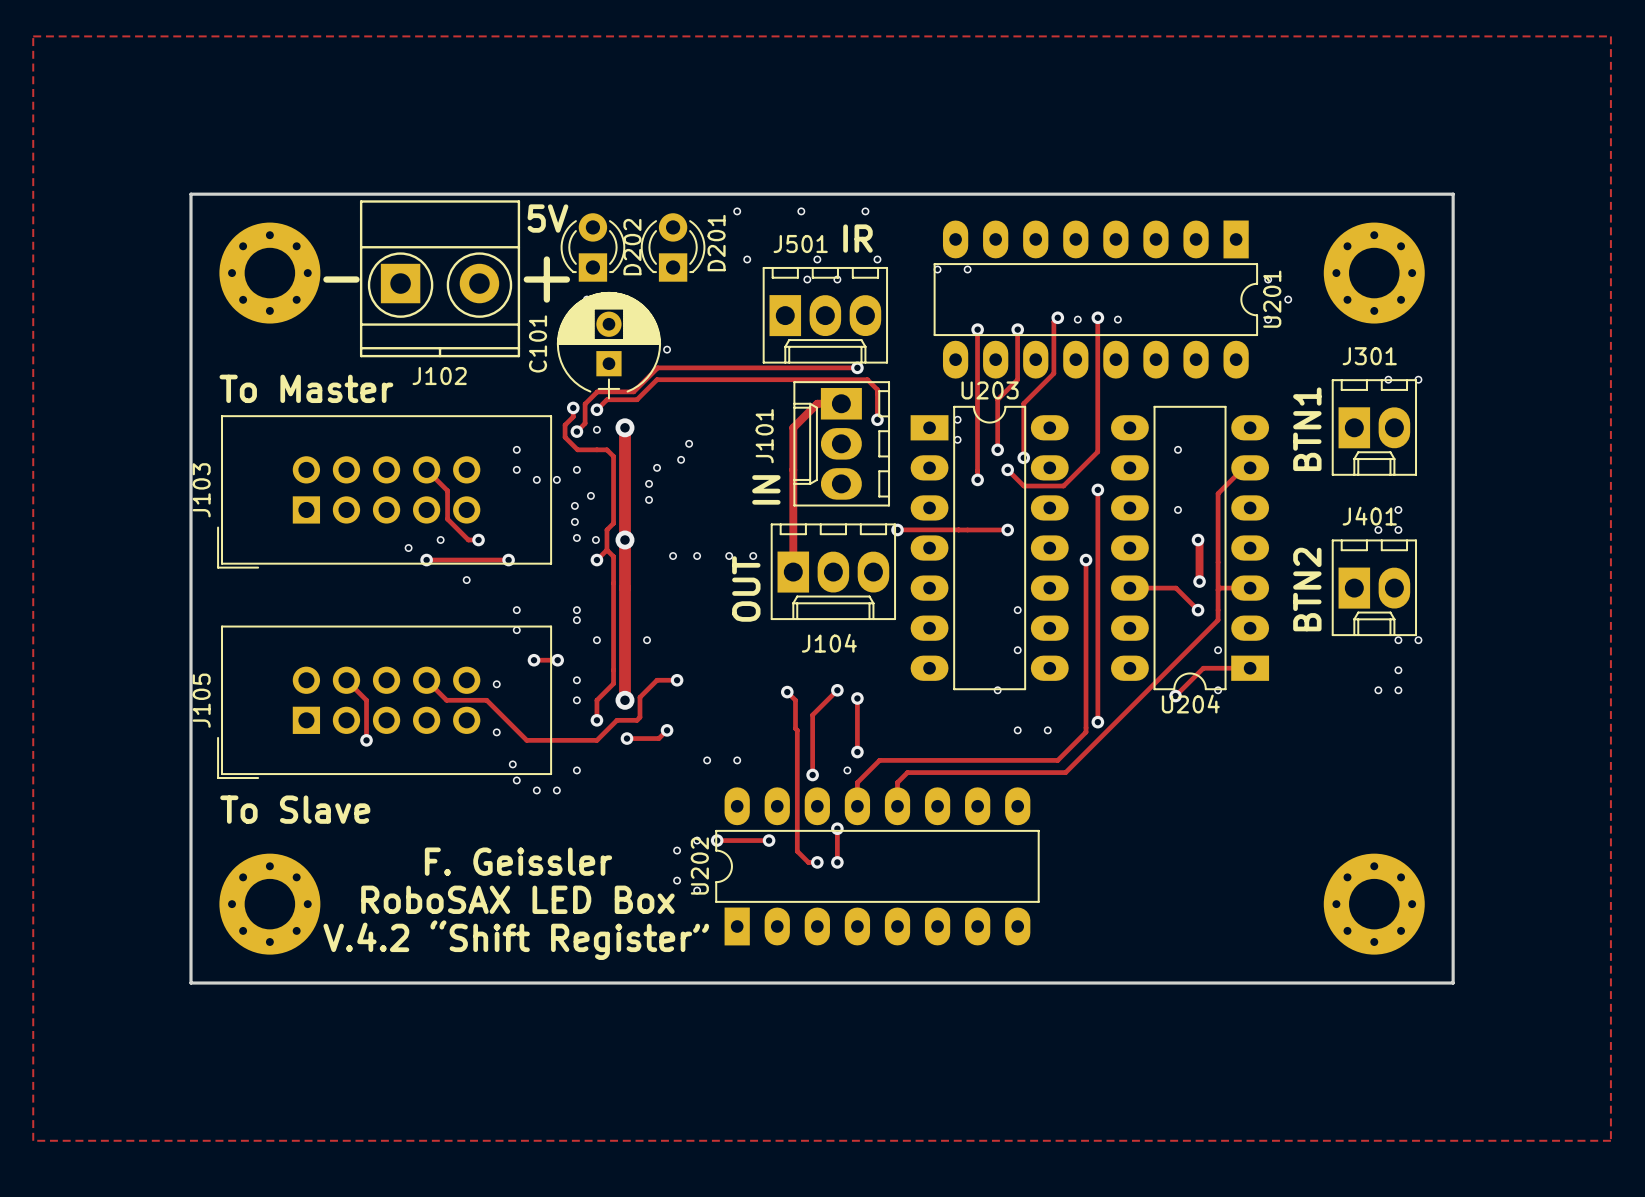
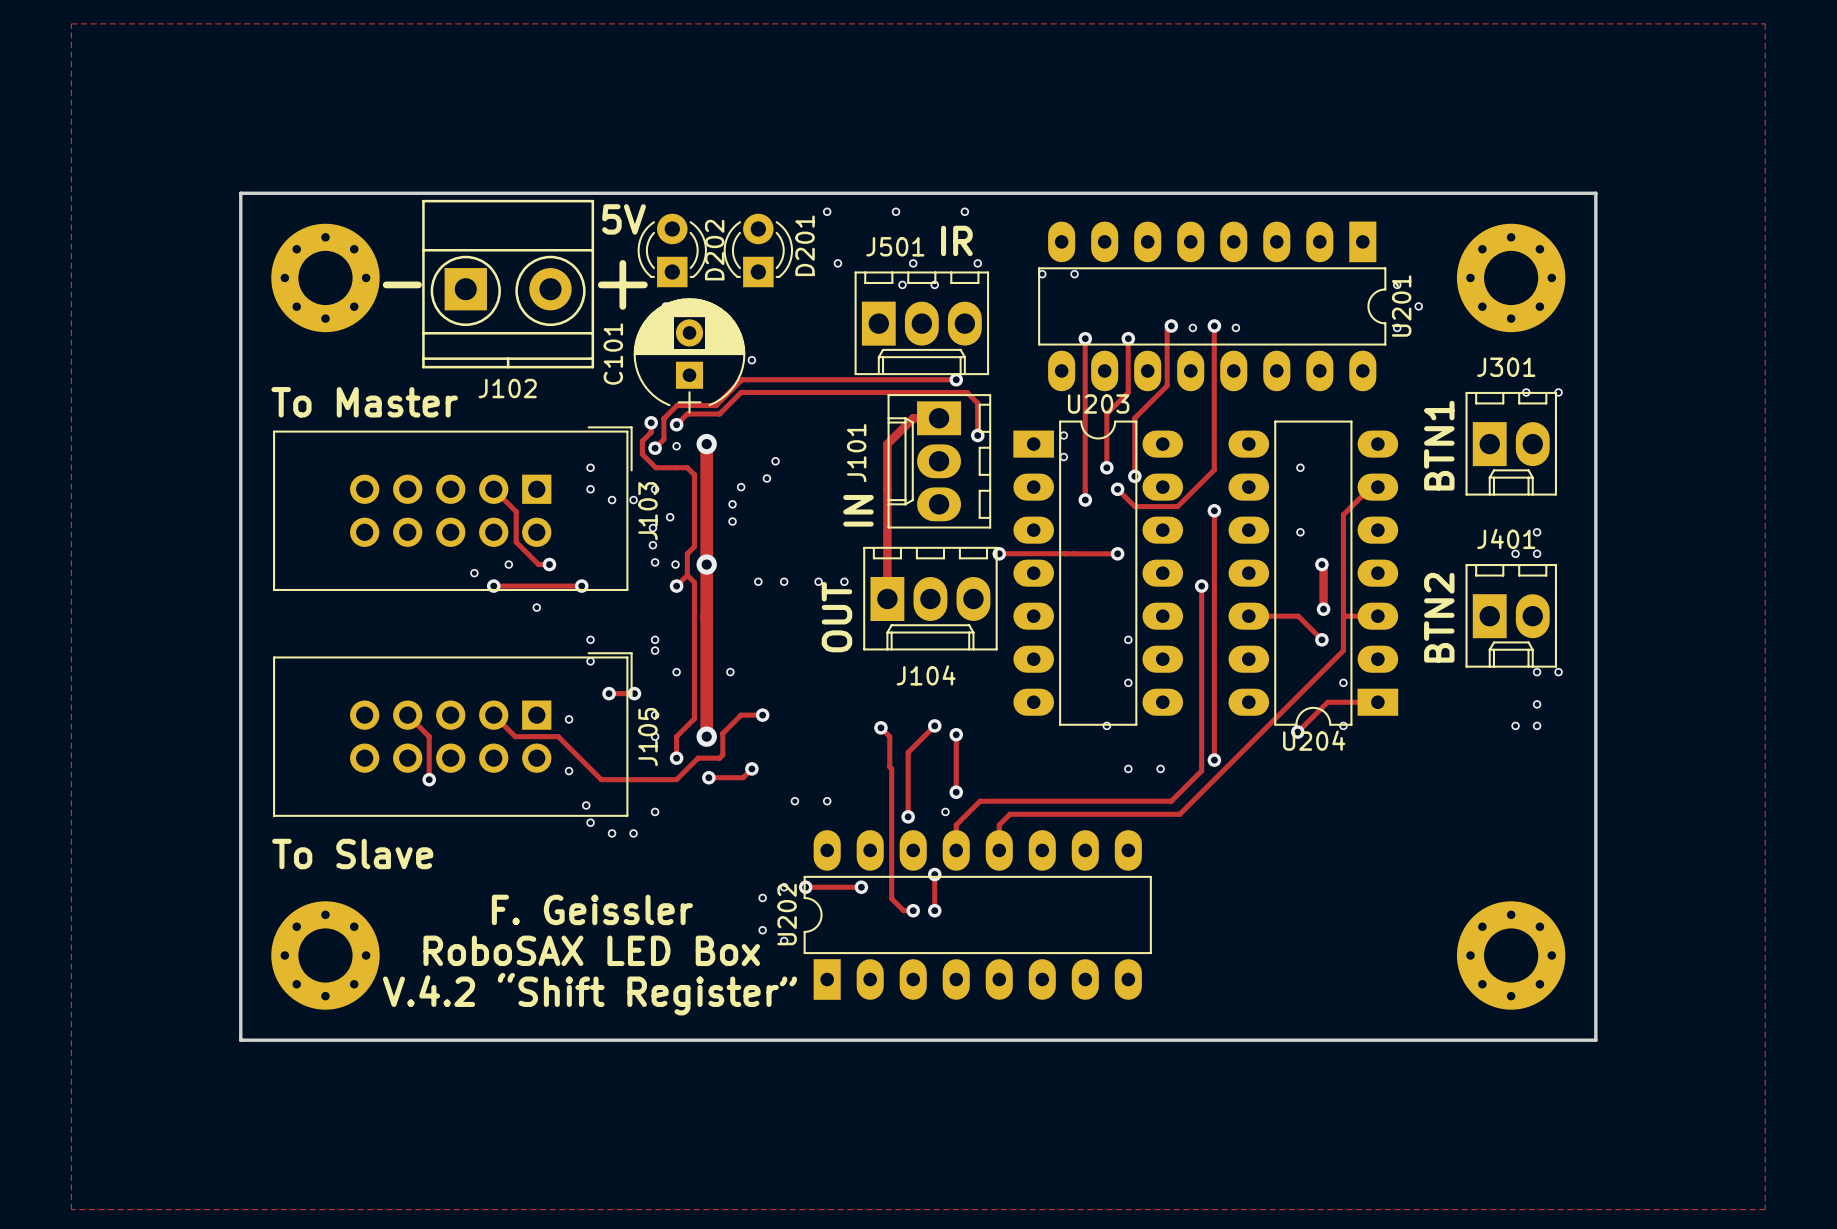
J103 rotation: 0° (384, 491) -> 180° (452, 508)
J105 rotation: 0° (384, 702) -> 180° (452, 734)

